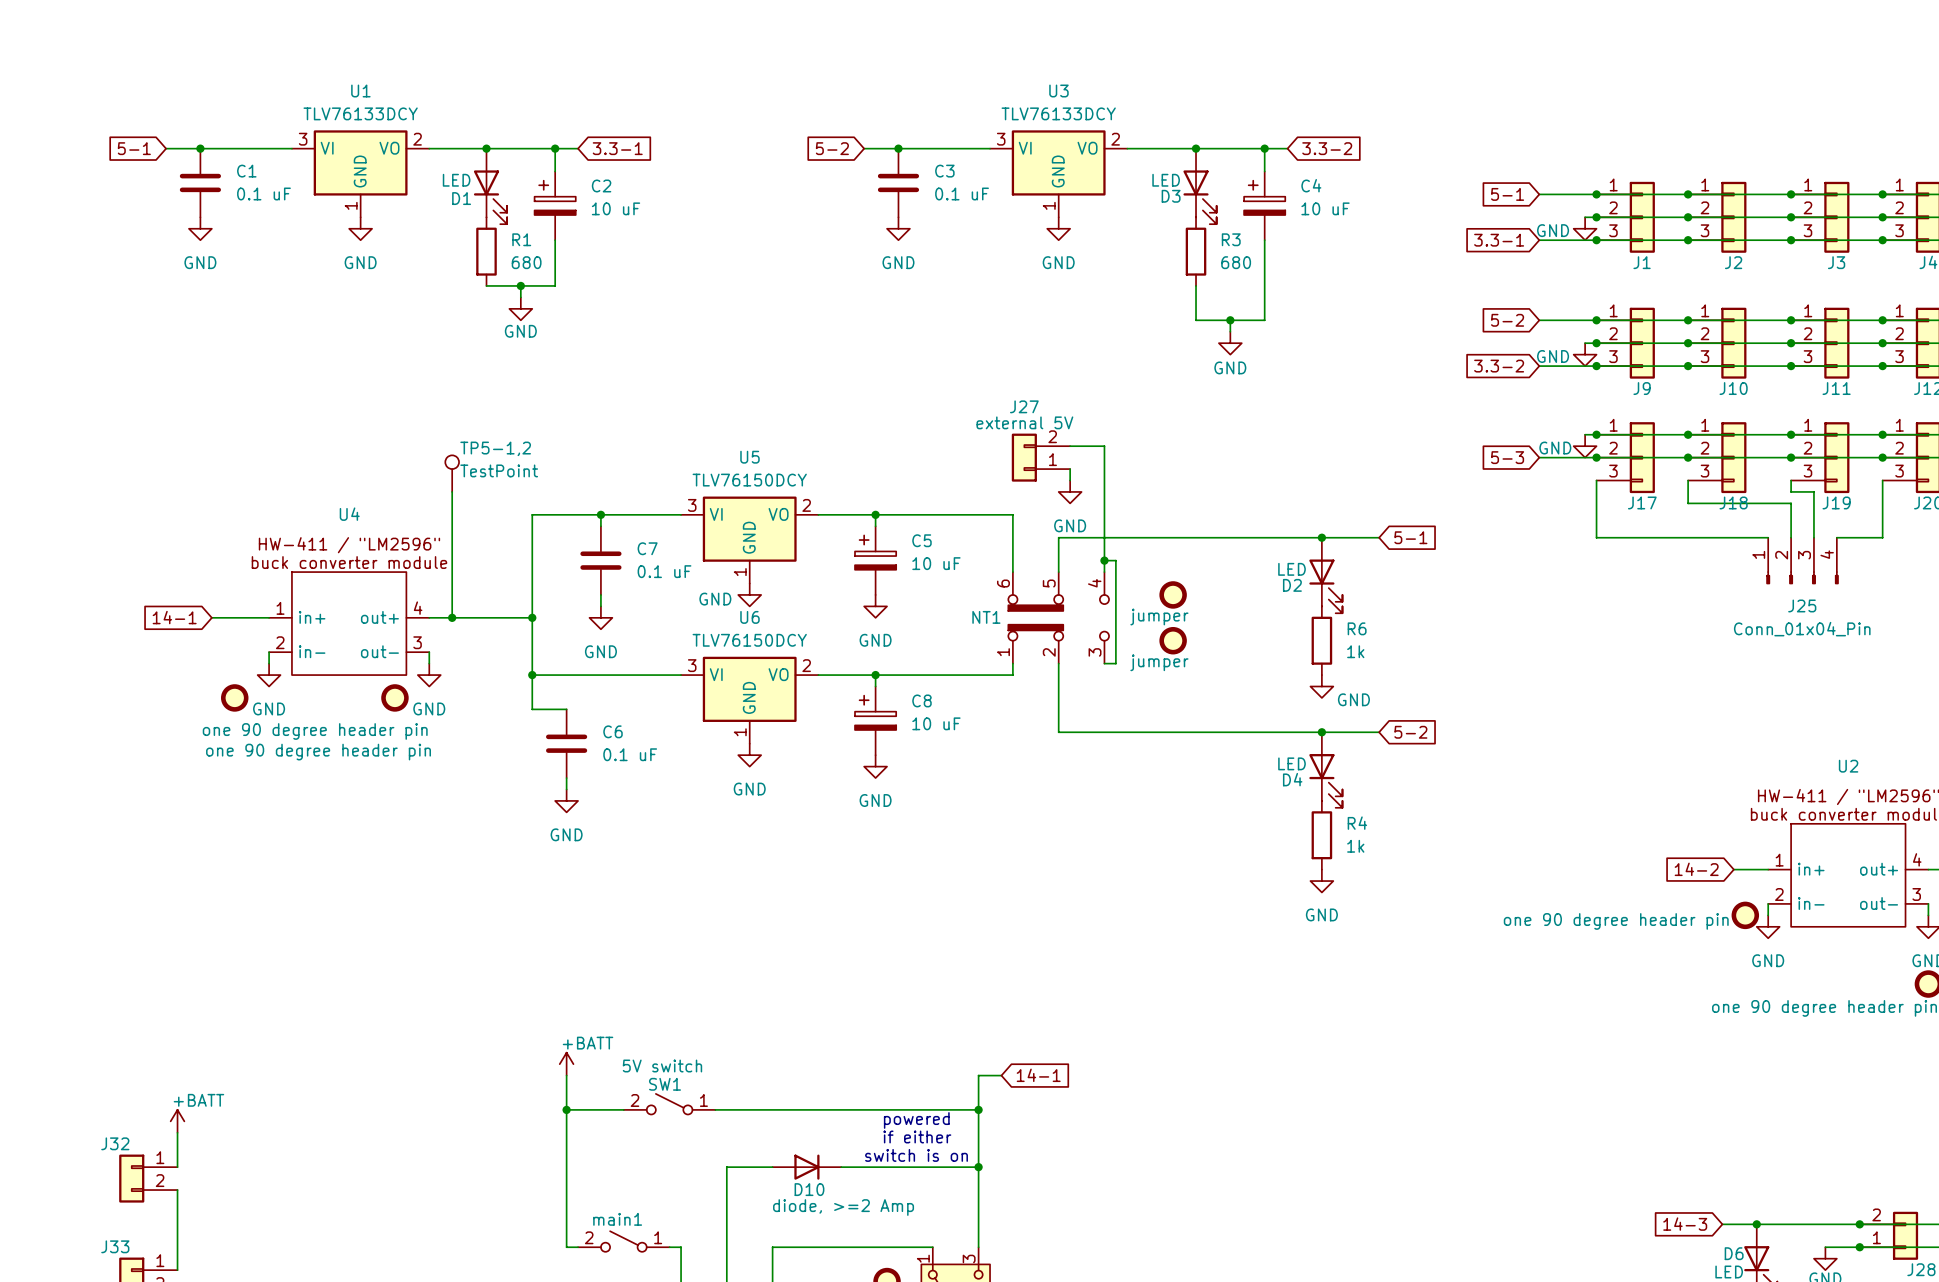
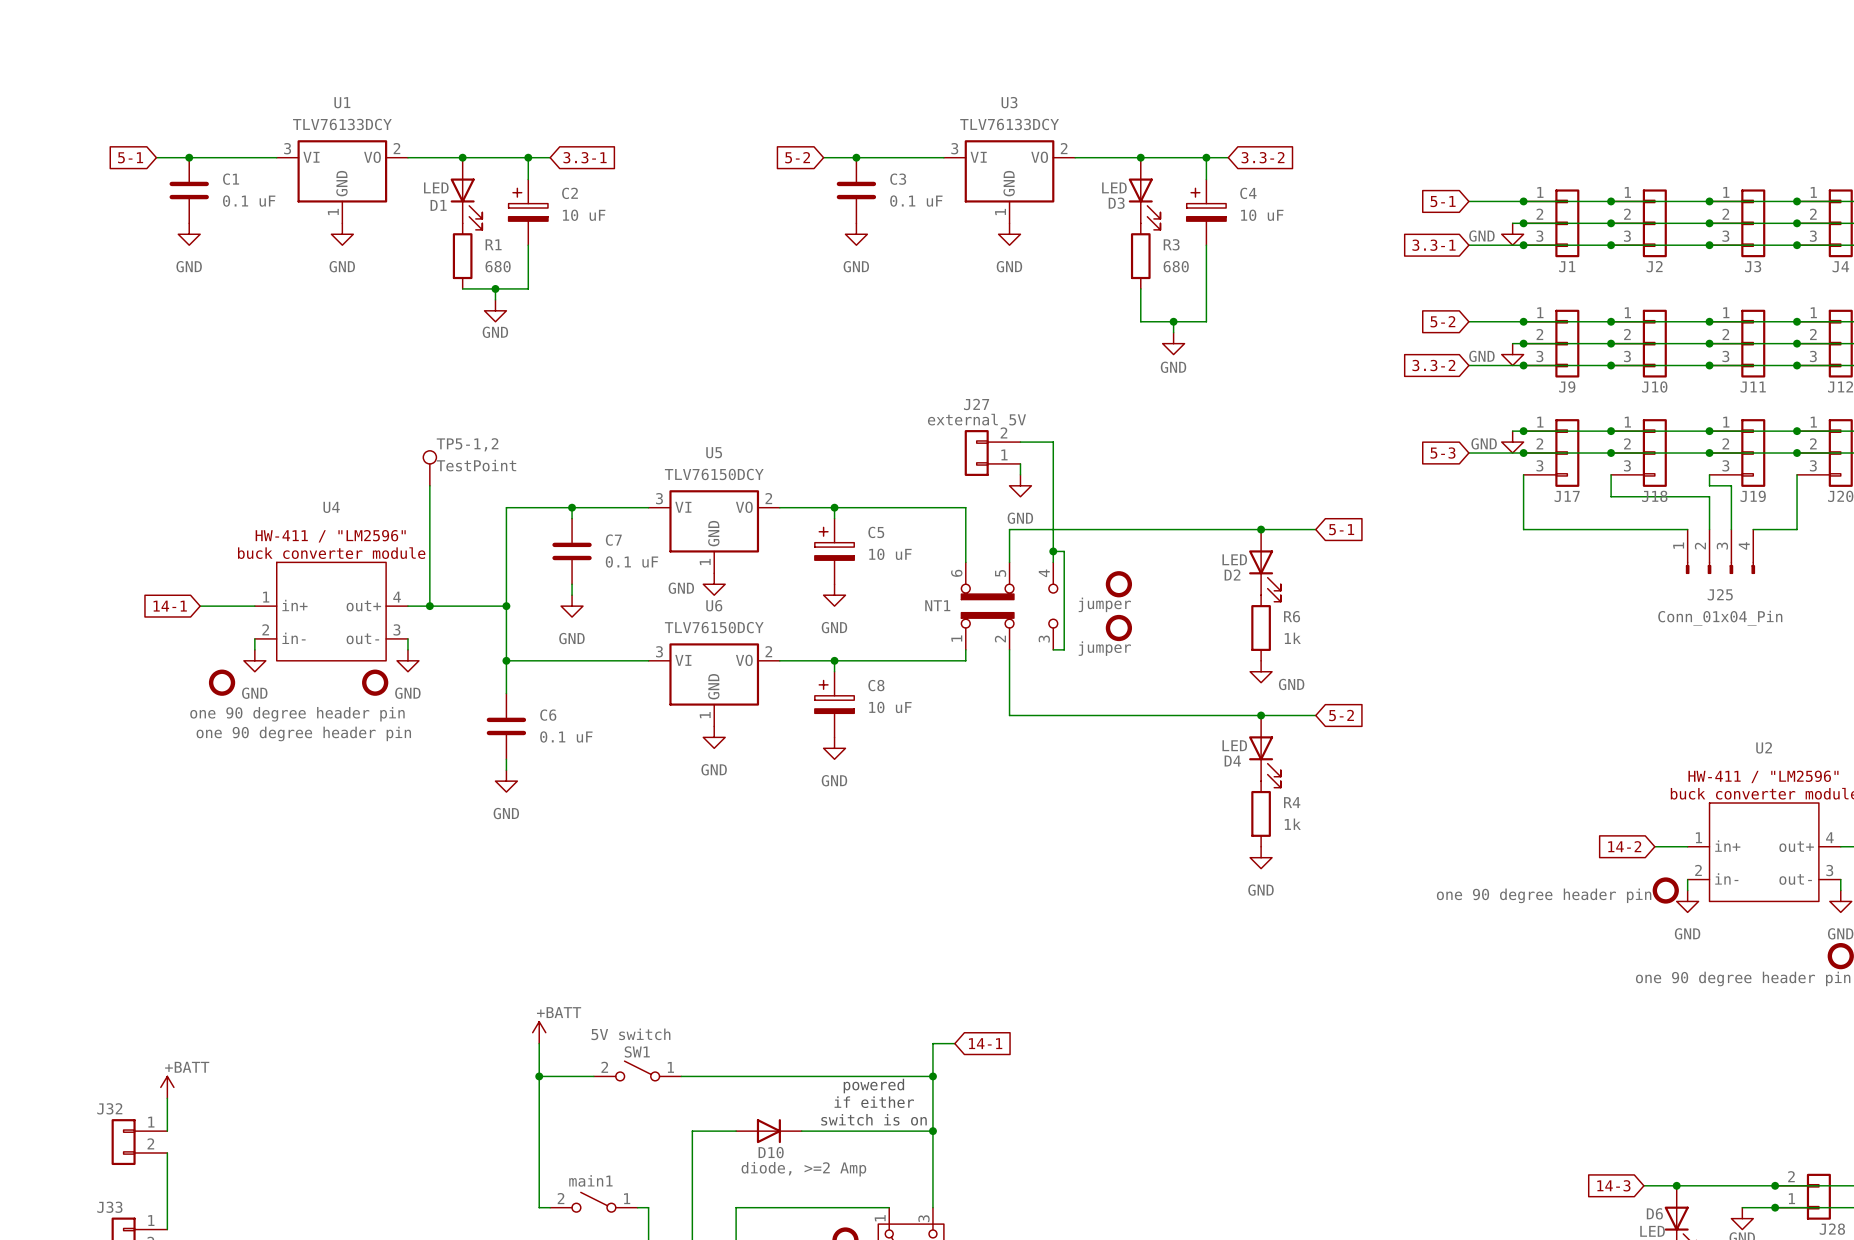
wire: (532, 709) (566, 709) -> none
C6 position: (566, 743) -> (506, 726)
wire: (566, 778) (566, 789) -> (506, 759) (506, 770)
power symbol position: GND (566, 800) -> GND (506, 781)

